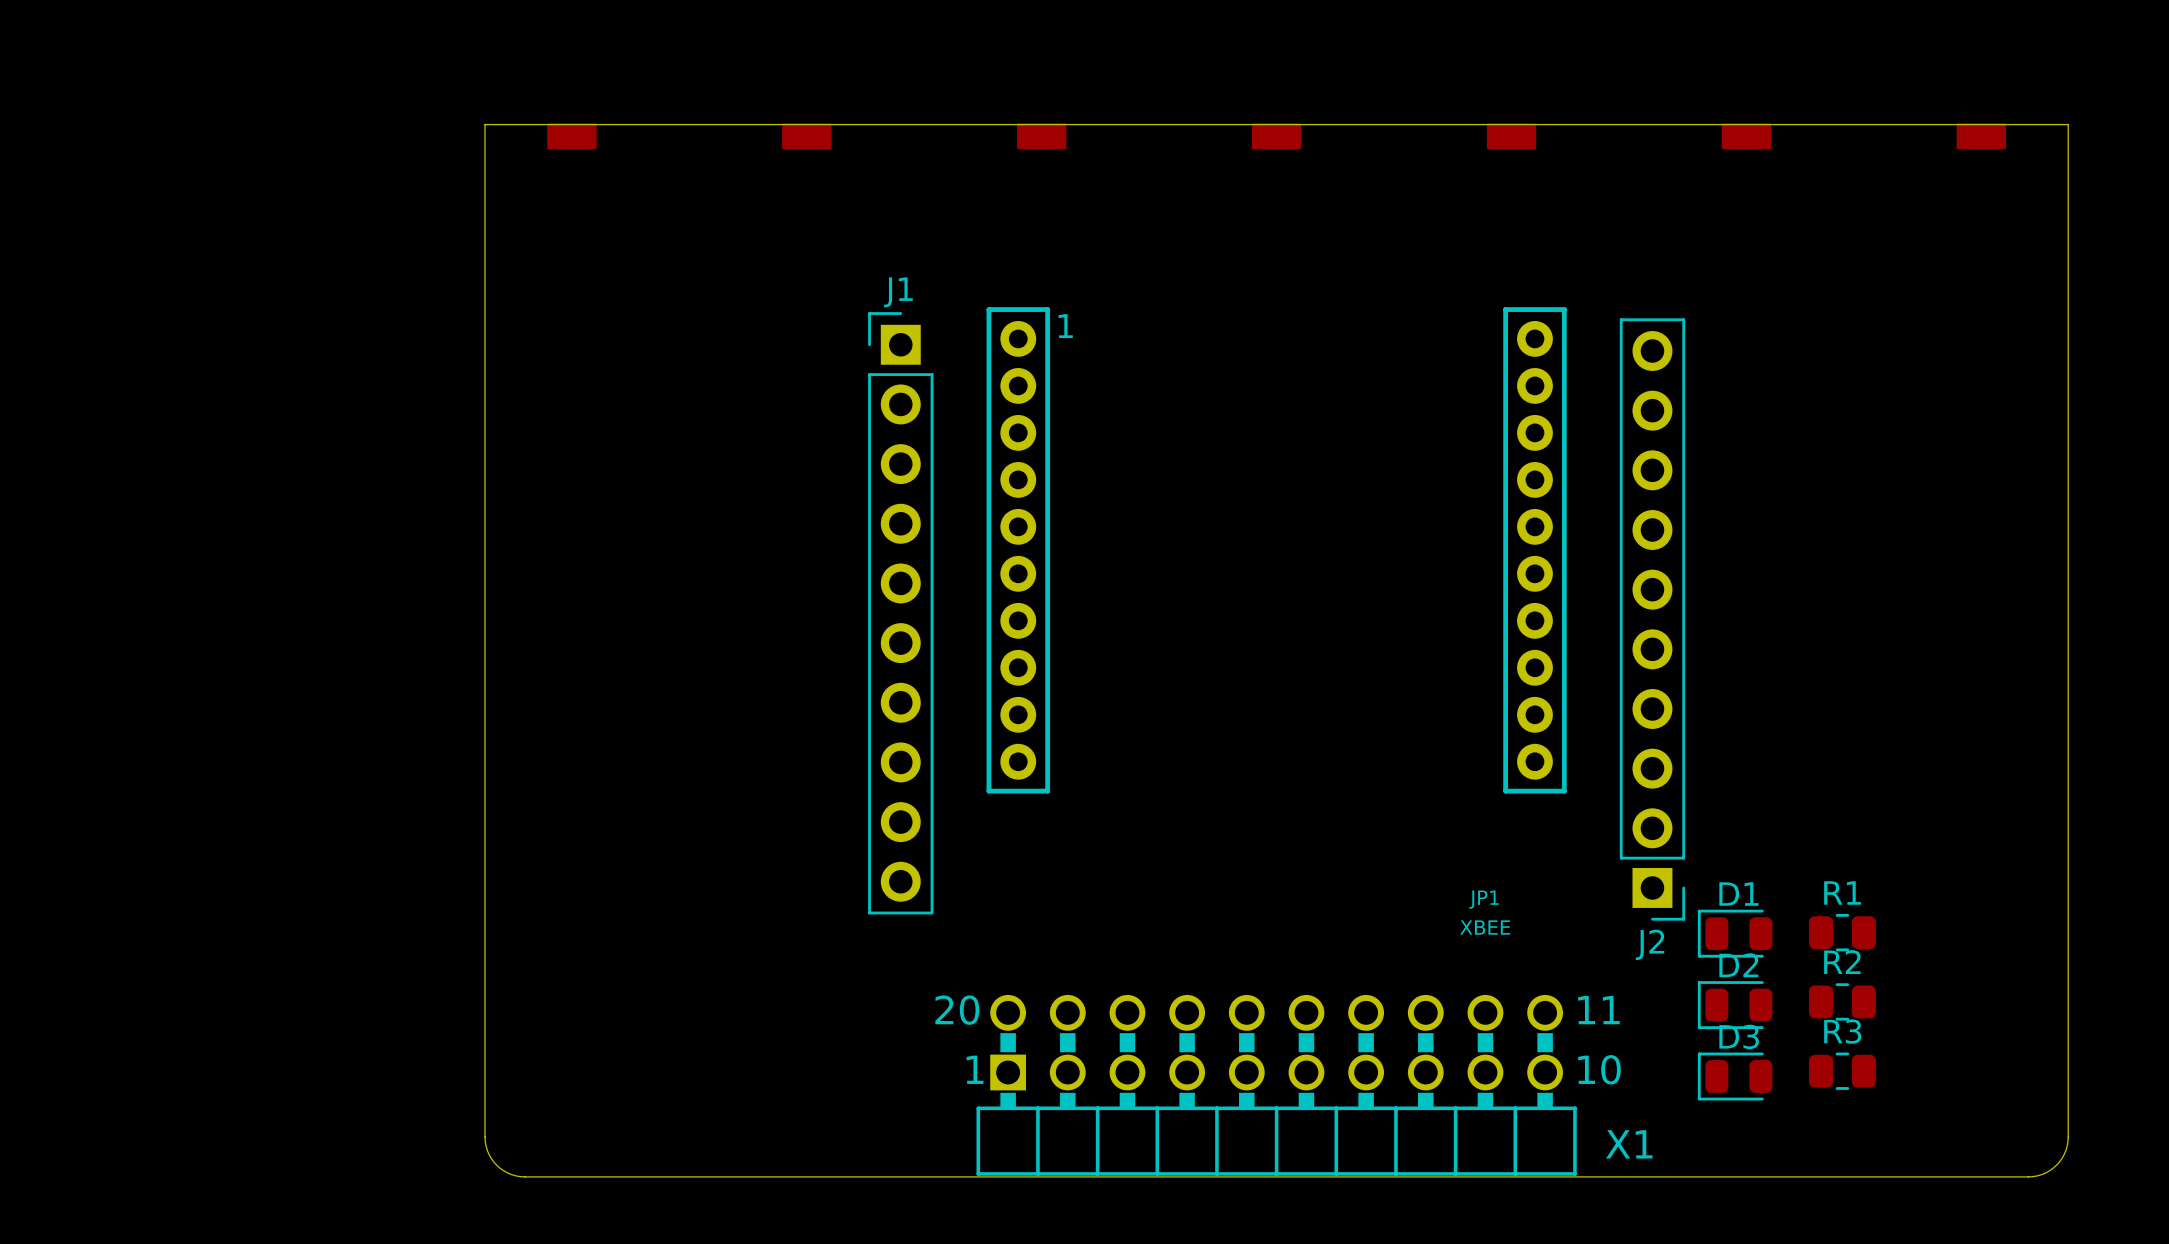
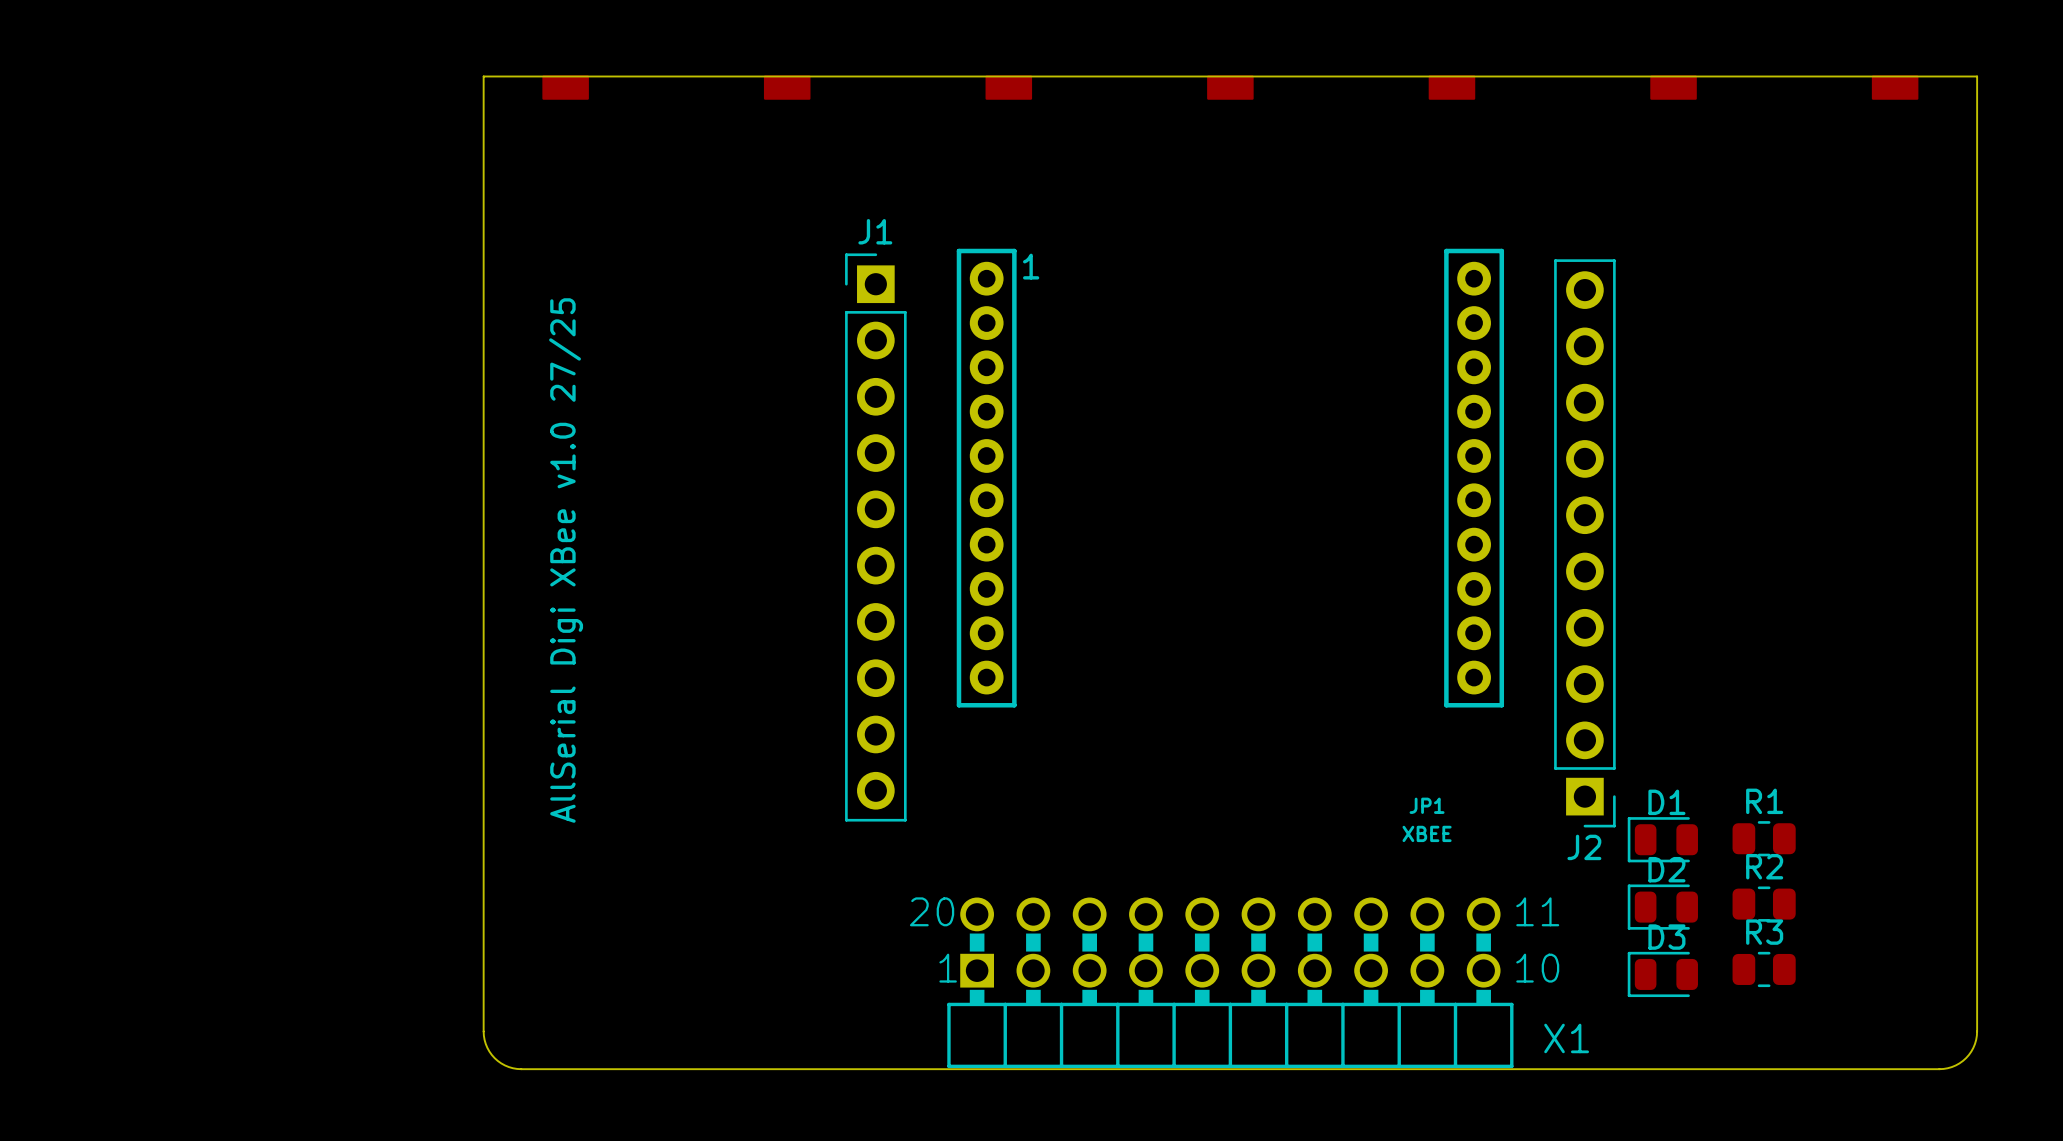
text: none -> AllSerial Digi XBee v1.0 27/25 (566, 560)

